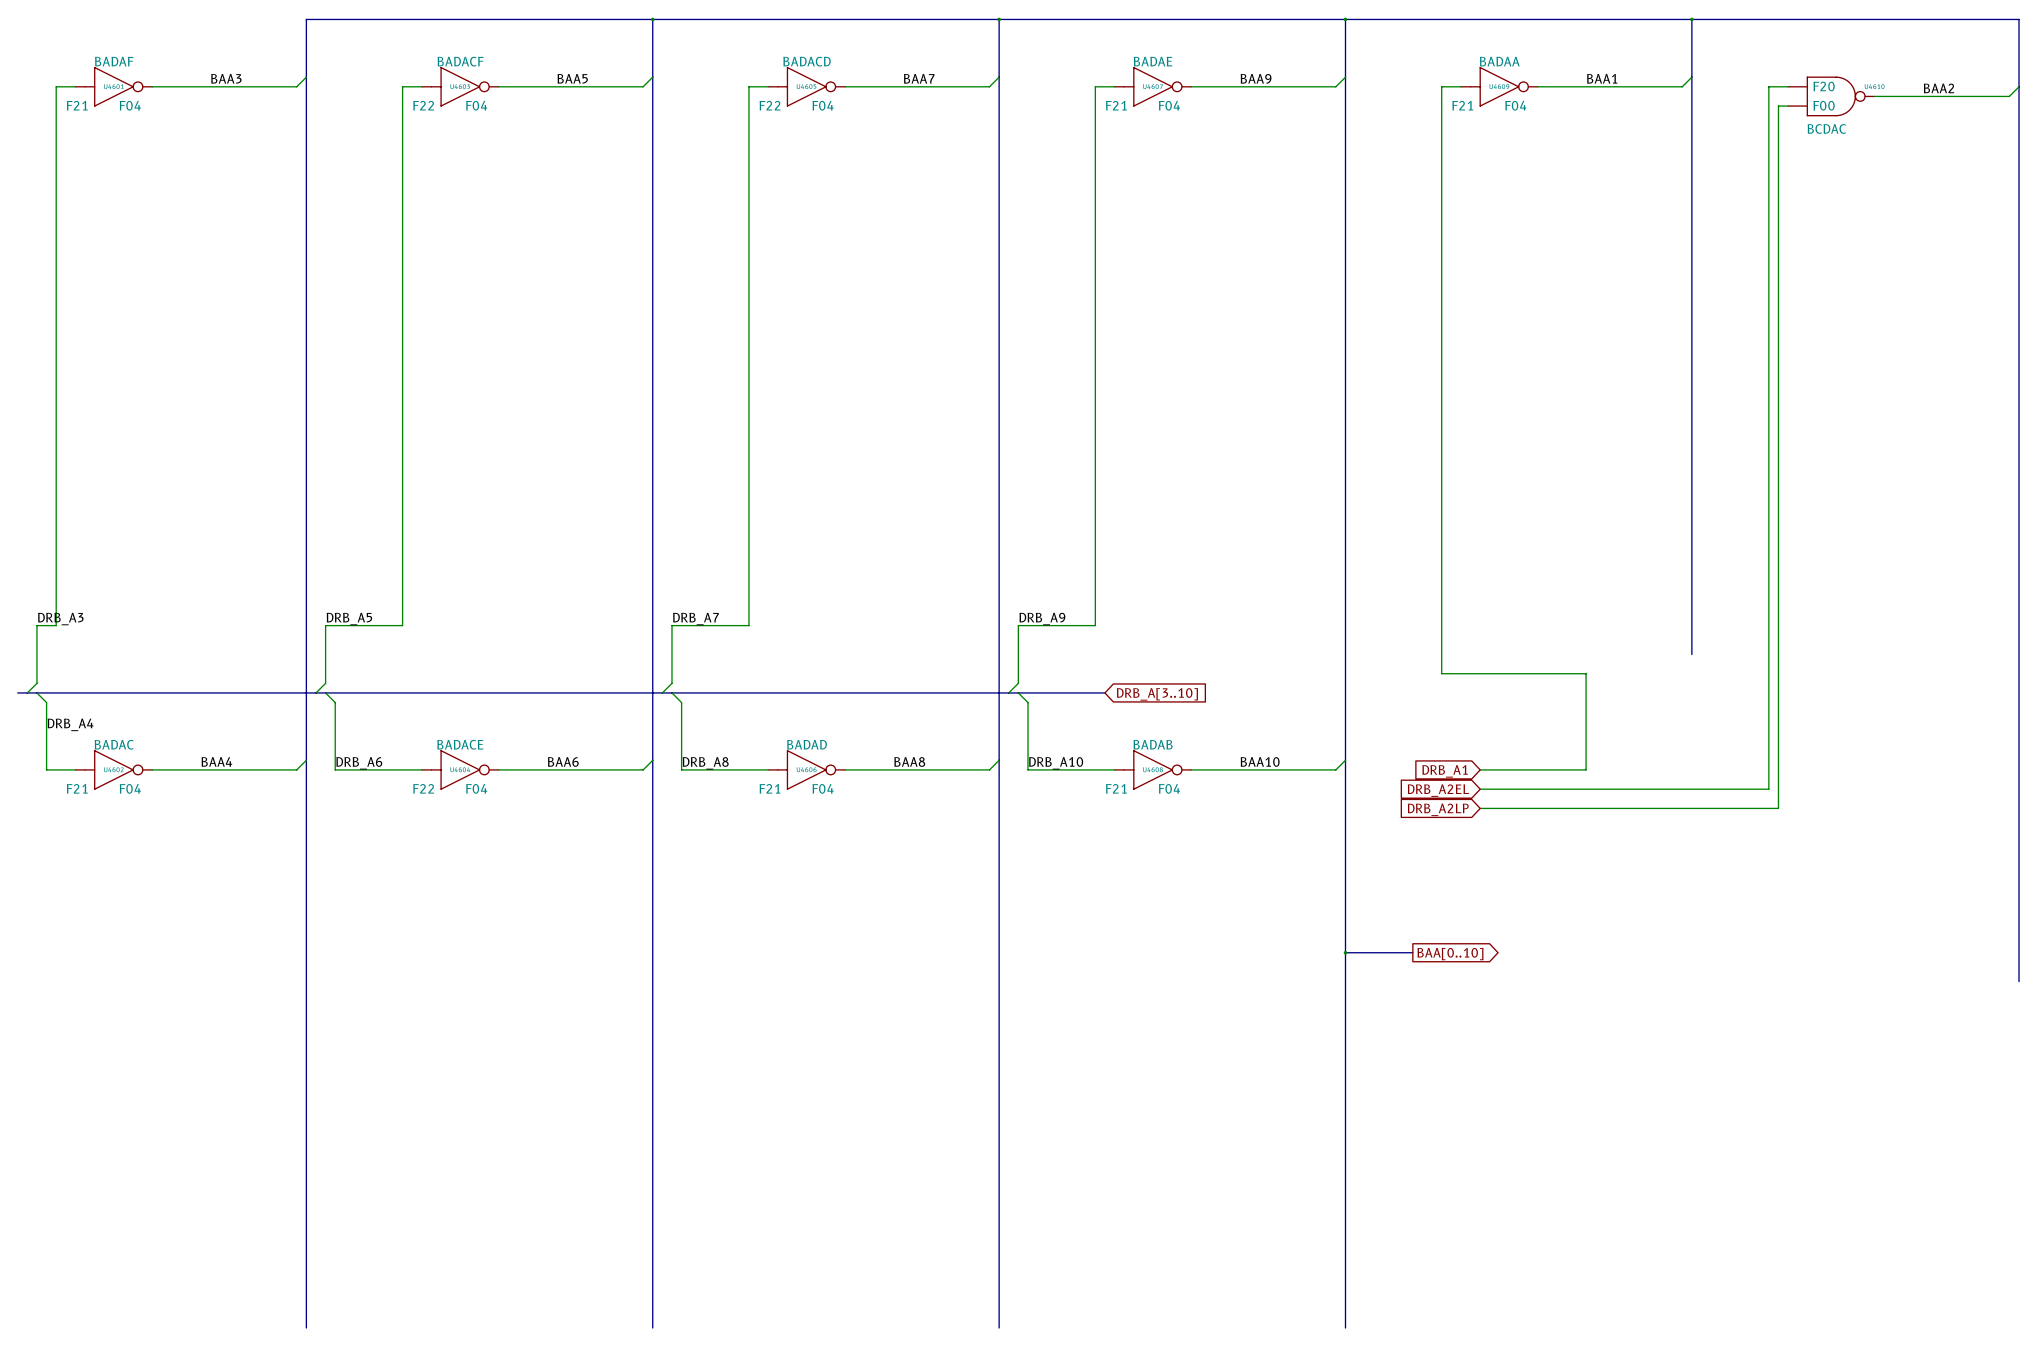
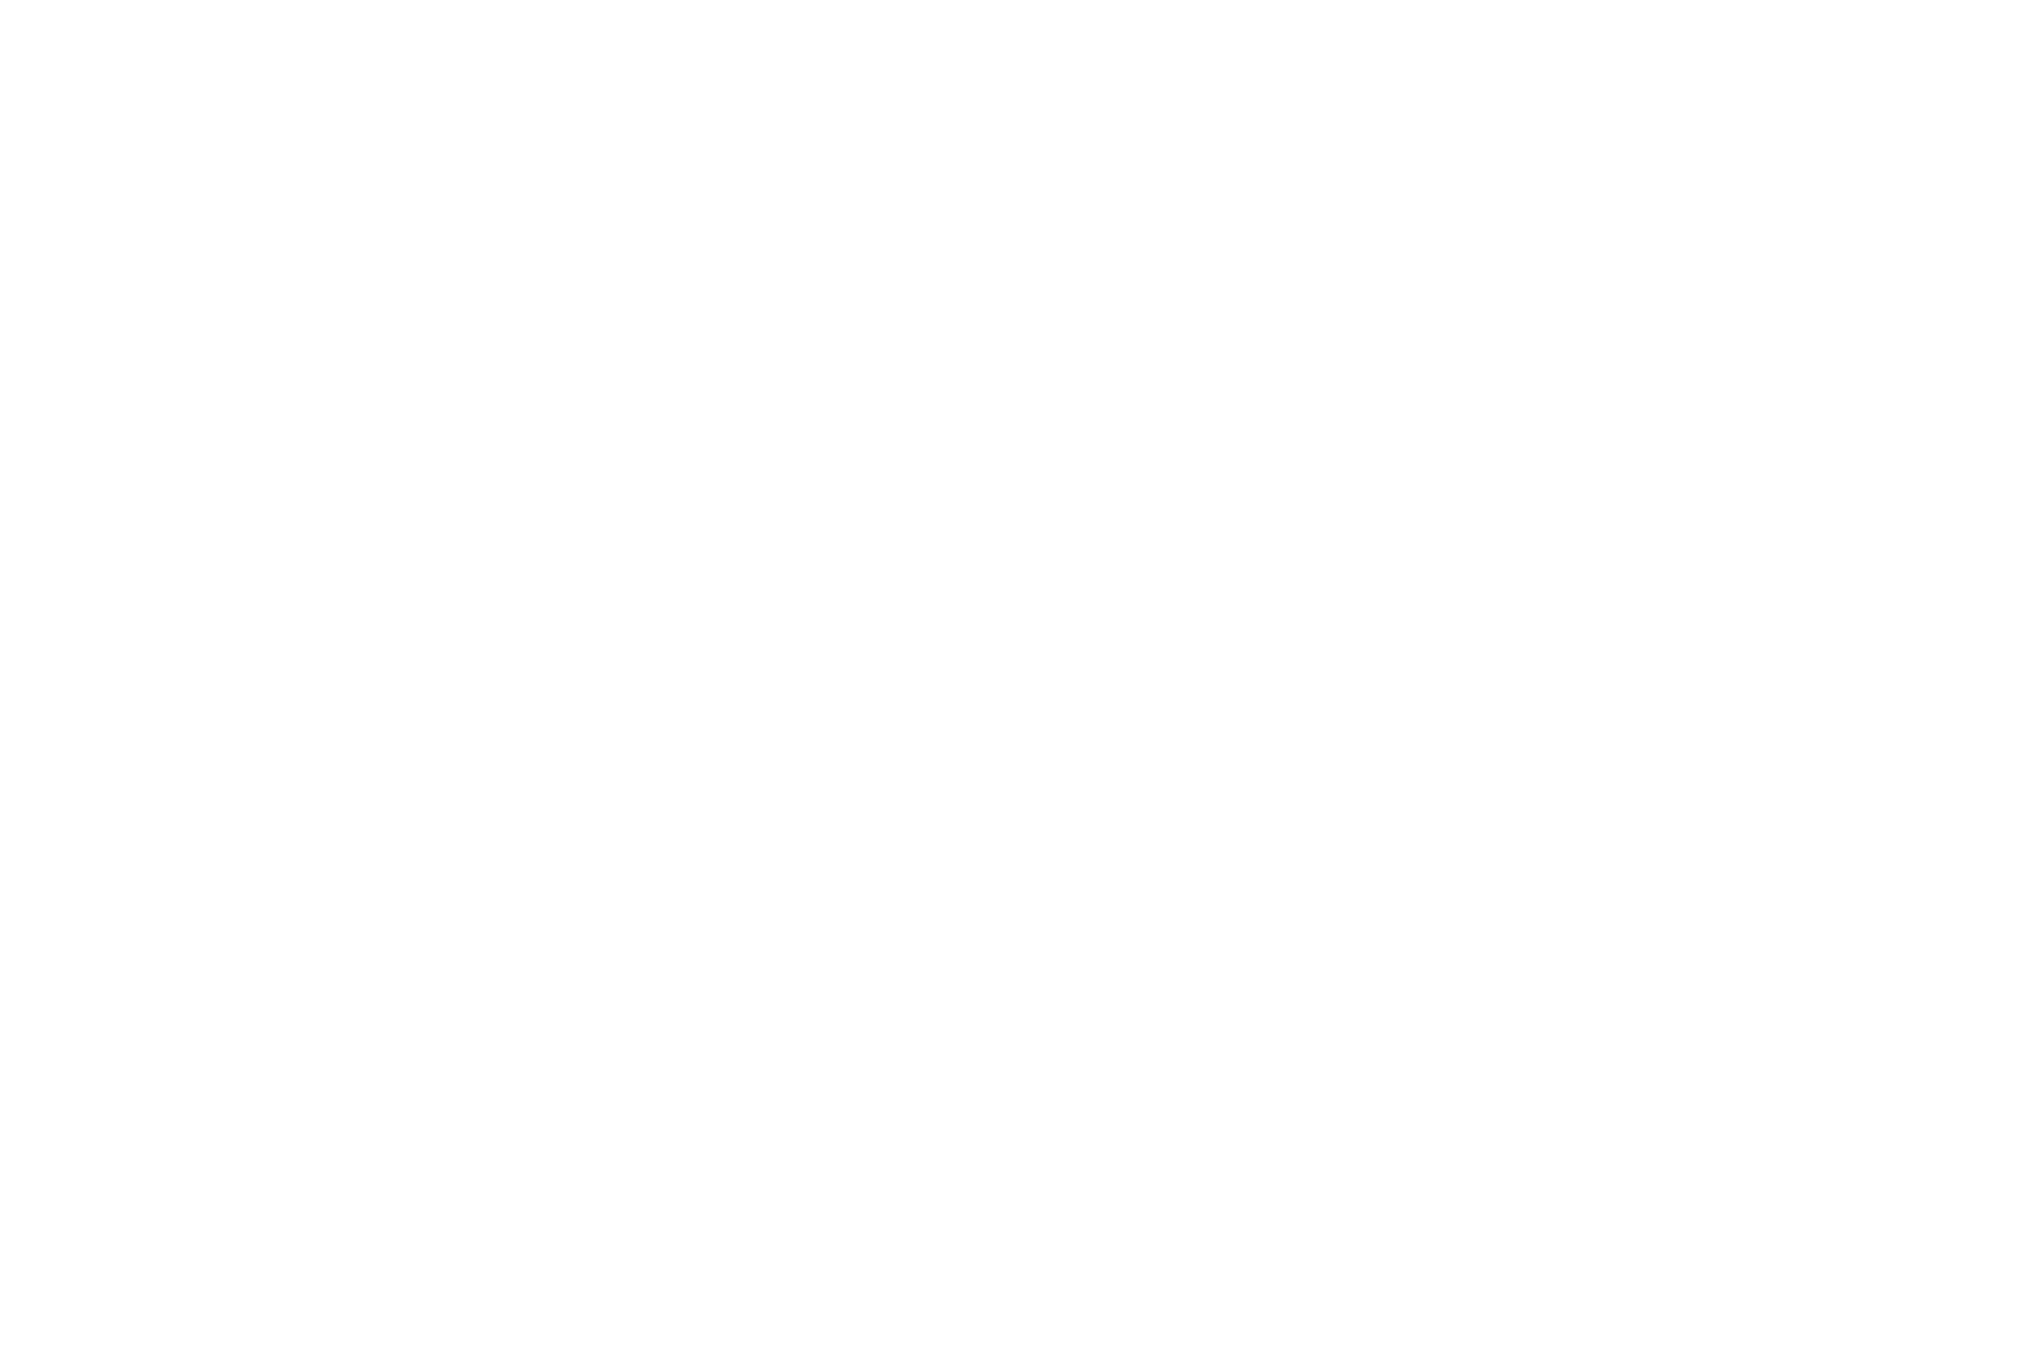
bus: (652, 19) (652, 1327) -> none
junction: (652, 19) -> none
bus: (999, 19) (999, 1327) -> none
junction: (999, 19) -> none
bus: (1345, 19) (1345, 1327) -> none
junction: (1345, 19) -> none
bus: (1691, 19) (1691, 654) -> none
junction: (1691, 19) -> none
wire: (306, 77) (296, 86) (152, 86) -> none
wire: (652, 77) (643, 86) (498, 86) -> none
wire: (999, 77) (989, 86) (845, 86) -> none
wire: (1345, 77) (1335, 86) (1191, 86) -> none
wire: (1691, 77) (1682, 86) (1537, 86) -> none
label: BAA3 (226, 78) -> none
label: BAA5 (572, 78) -> none
label: BAA7 (919, 78) -> none
label: BAA9 (1256, 78) -> none
label: BAA1 (1602, 78) -> none
wire: (75, 86) (56, 86) (56, 625) (36, 625) (36, 683) (27, 692) -> none
part: F04 (113, 86) -> none
wire: (421, 86) (402, 86) (402, 625) (325, 625) (325, 683) (315, 692) -> none
part: F04 (460, 86) -> none
wire: (768, 86) (748, 86) (748, 625) (671, 625) (671, 683) (662, 692) -> none
part: F04 (806, 86) -> none
wire: (1114, 86) (1095, 86) (1095, 625) (1018, 625) (1018, 683) (1008, 692) -> none
part: F04 (1153, 86) -> none
wire: (1460, 86) (1441, 86) (1441, 673) (1586, 673) (1586, 769) (1480, 769) -> none
part: F04 (1499, 86) -> none
wire: (1788, 86) (1768, 86) (1768, 789) (1480, 789) -> none
wire: (2019, 86) (2009, 96) (1874, 96) -> none
label: BAA2 (1938, 88) -> none
part: F00 (1831, 96) -> none
wire: (1788, 106) (1778, 106) (1778, 808) (1480, 808) -> none
label: DRB_A3 (60, 619) -> none
label: DRB_A5 (349, 619) -> none
label: DRB_A7 (695, 619) -> none
label: DRB_A9 (1042, 619) -> none
bus: (17, 692) (1104, 692) -> none
wire: (36, 692) (46, 702) (46, 769) (75, 769) -> none
wire: (325, 692) (335, 702) (335, 769) (421, 769) -> none
wire: (671, 692) (681, 702) (681, 769) (768, 769) -> none
wire: (1018, 692) (1027, 702) (1027, 769) (1114, 769) -> none
global label: DRB_A[3..10] (1157, 694) -> none
label: DRB_A4 (70, 724) -> none
wire: (306, 760) (296, 769) (152, 769) -> none
wire: (652, 760) (643, 769) (498, 769) -> none
wire: (999, 760) (989, 769) (845, 769) -> none
wire: (1345, 760) (1335, 769) (1191, 769) -> none
label: BAA4 (216, 761) -> none
label: BAA6 (563, 761) -> none
label: BAA8 (909, 761) -> none
label: BAA10 (1260, 761) -> none
label: DRB_A6 (359, 763) -> none
label: DRB_A8 (705, 763) -> none
label: DRB_A10 (1056, 763) -> none
part: F04 (113, 769) -> none
part: F04 (460, 769) -> none
part: F04 (806, 769) -> none
part: F04 (1153, 769) -> none
global label: DRB_A1 (1445, 771) -> none
global label: DRB_A2EL (1438, 790) -> none
global label: DRB_A2LP (1438, 809) -> none
bus: (1345, 952) (1412, 952) -> none
junction: (1345, 952) -> none
global label: BAA[0..10] (1450, 954) -> none
bus: (2019, 981) (2019, 19) (306, 19) (306, 1327) -> none

